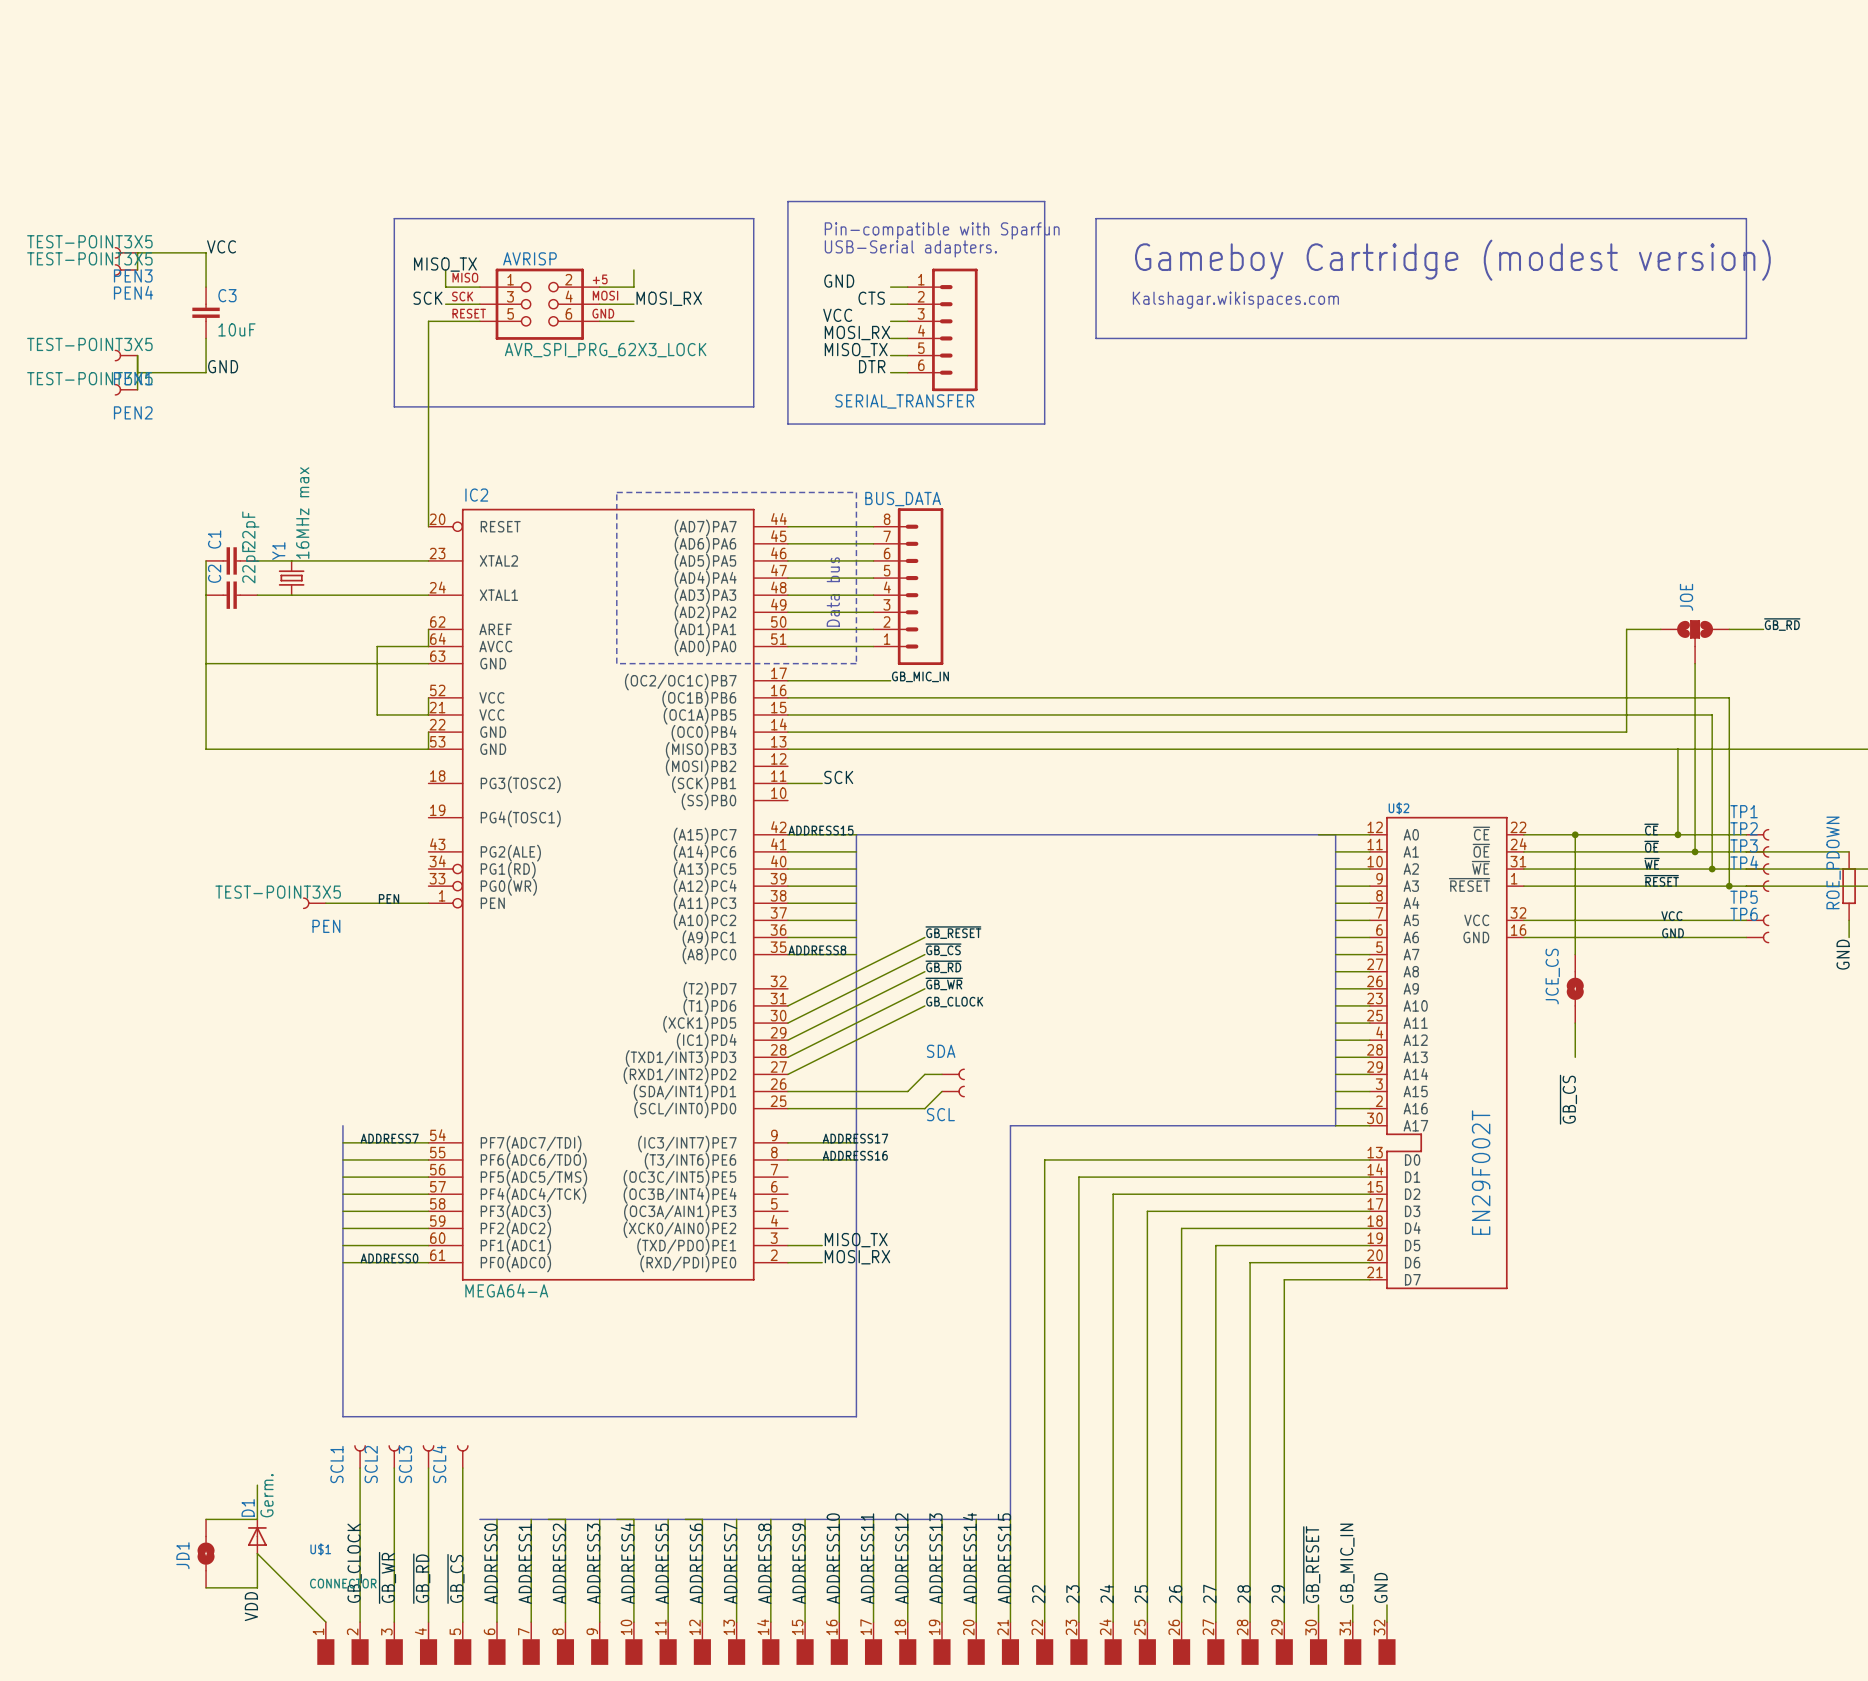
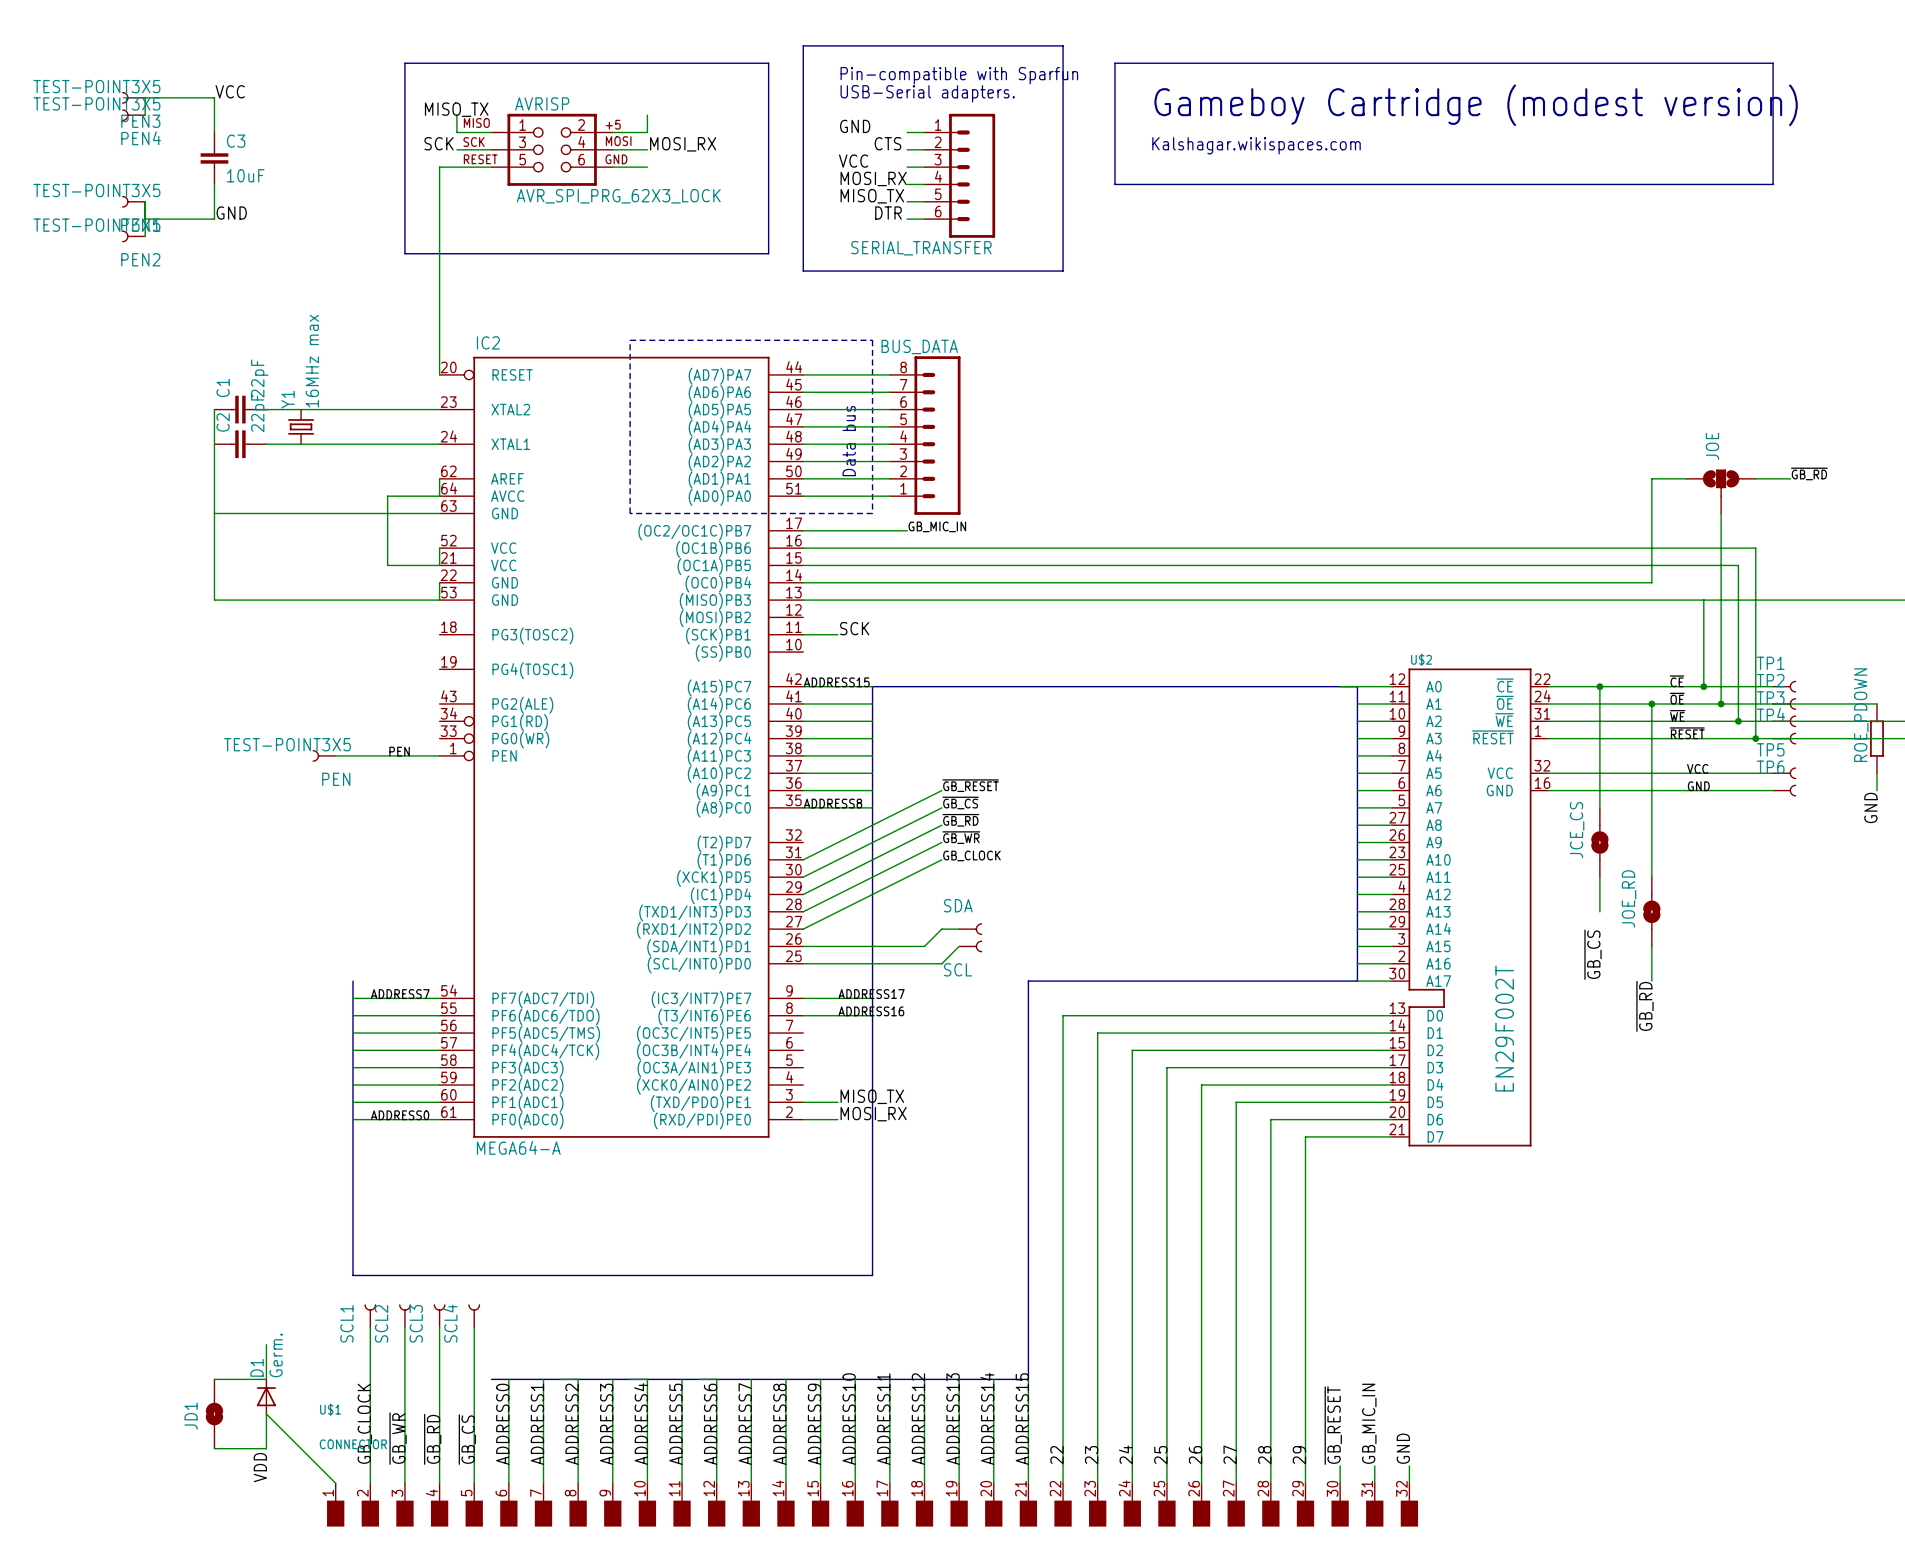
wire: none -> (1651, 703) (1651, 877)
junction: none -> (1651, 703)
JOE_RD: none -> (1651, 911)
wire: none -> (1651, 946) (1651, 981)
label: none -> ~{GB_RD} (1644, 1006)

